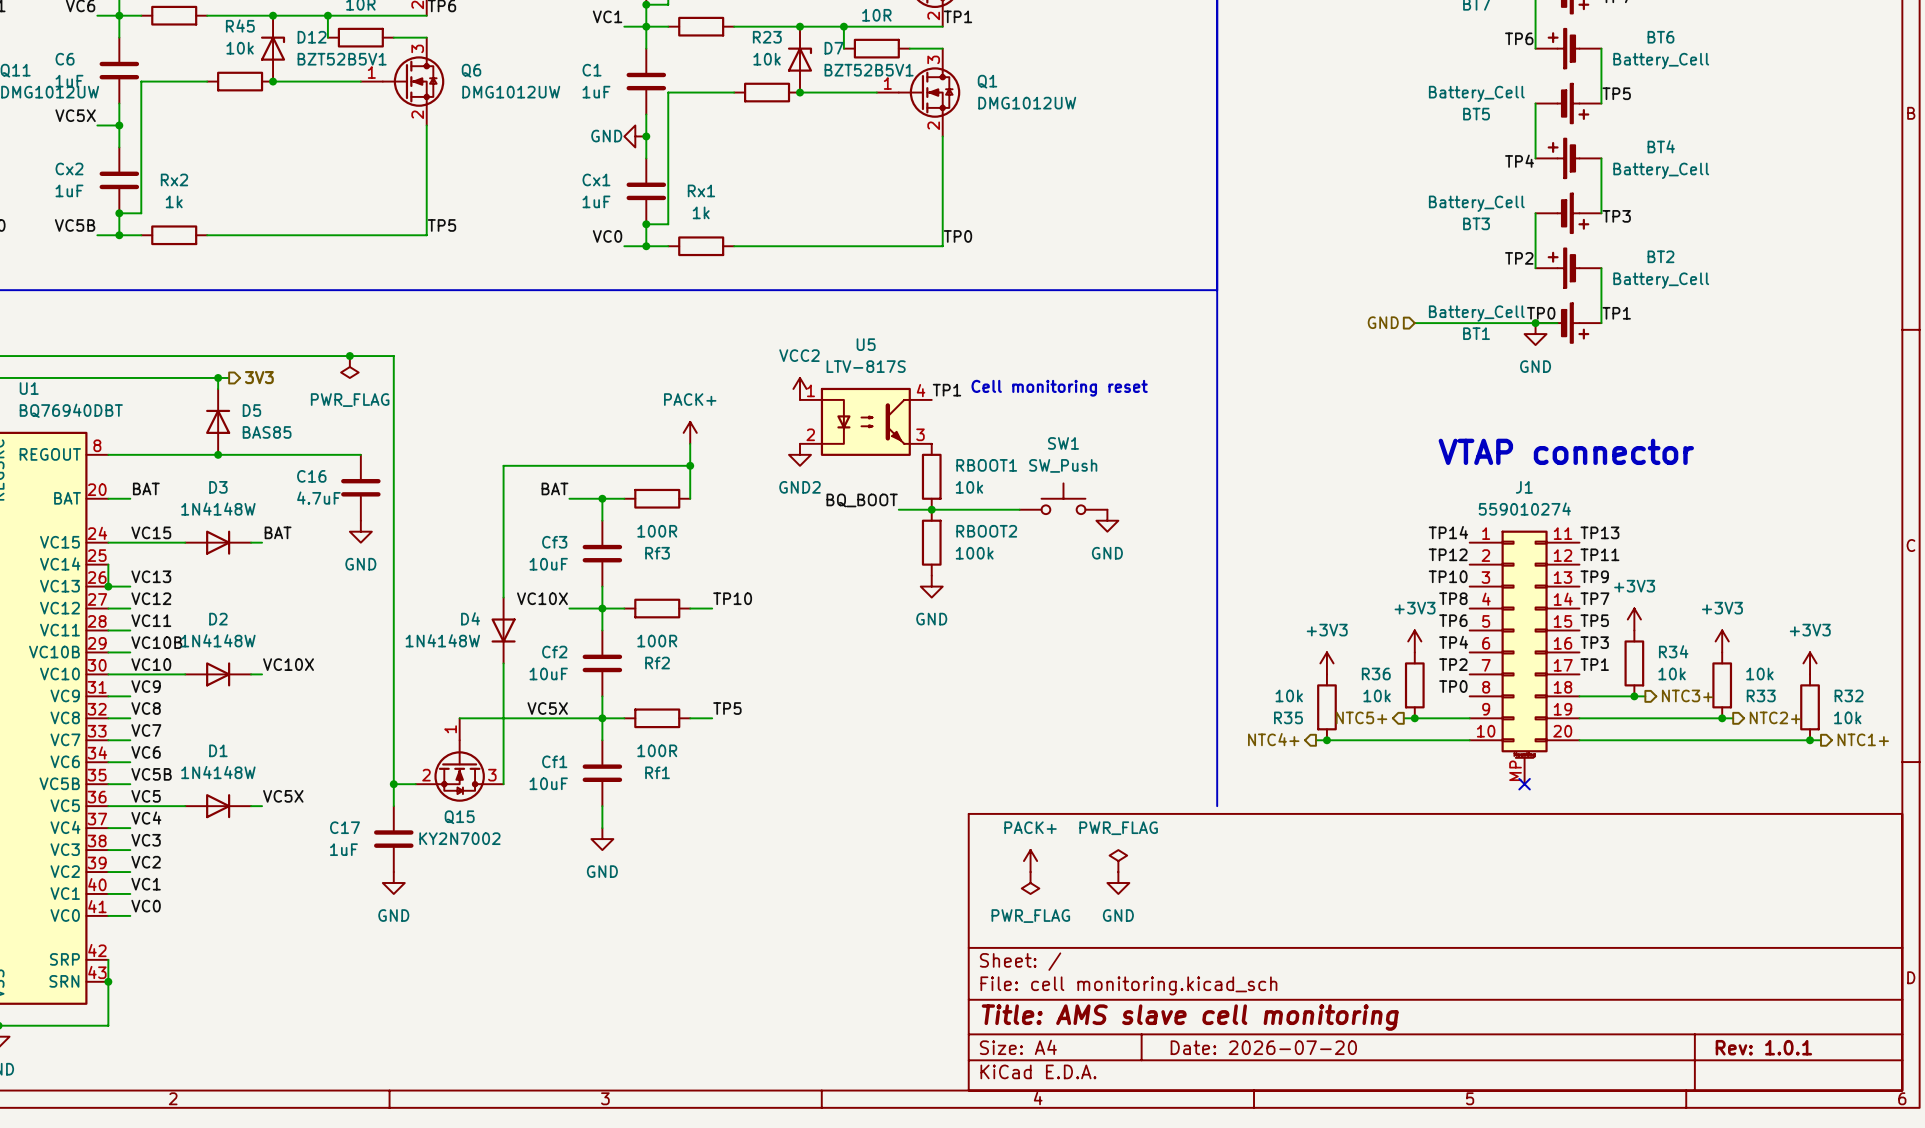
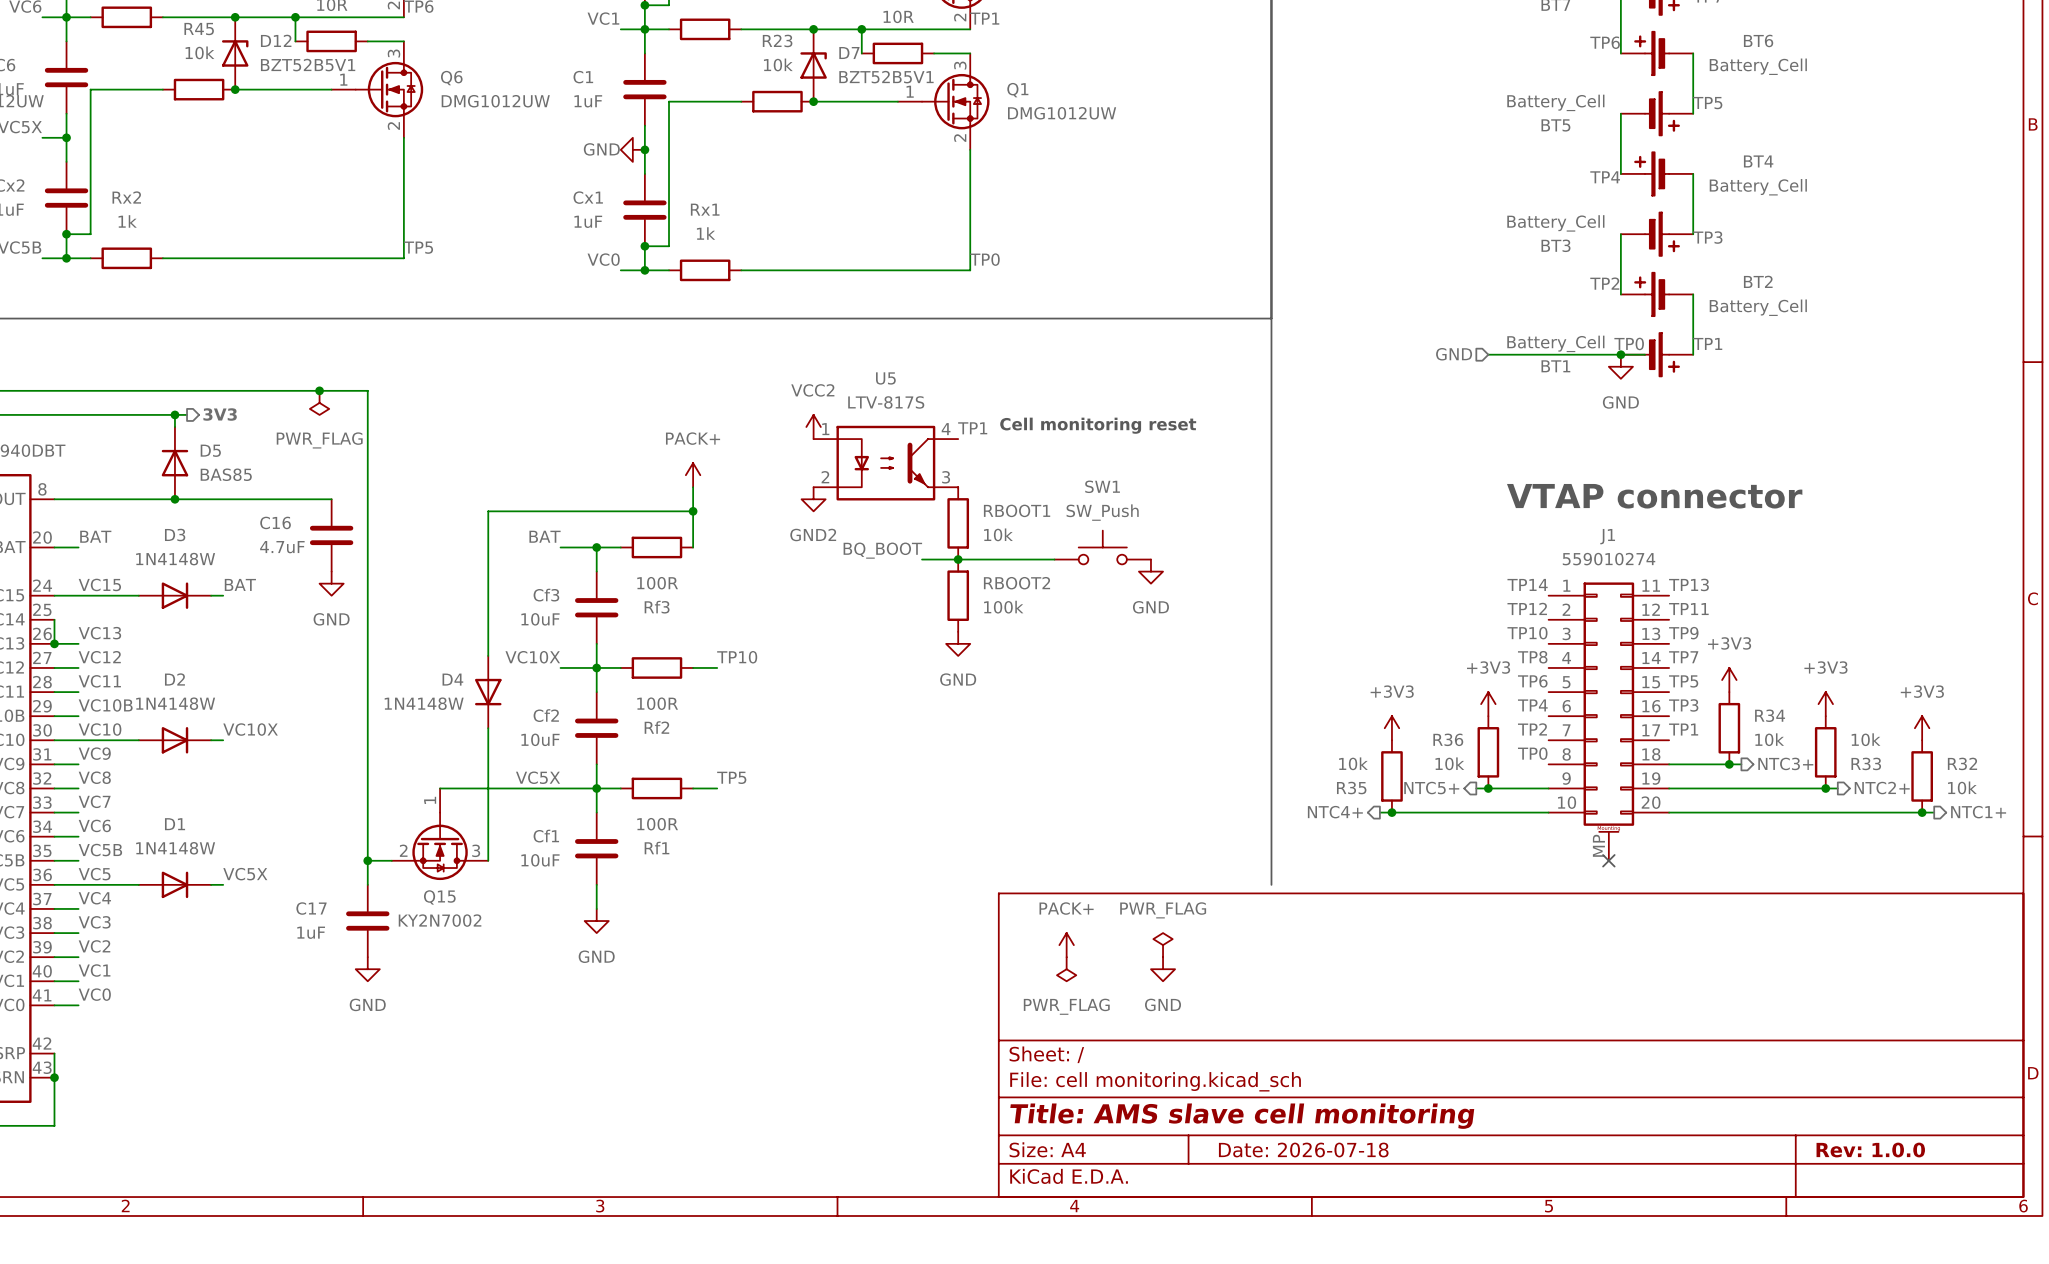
title block: Date: 2026-07-20 (1263, 1047) -> Date: 2026-07-18 (1303, 1150)
title block: Rev: 1.0.1 (1763, 1047) -> Rev: 1.0.0 (1870, 1150)

